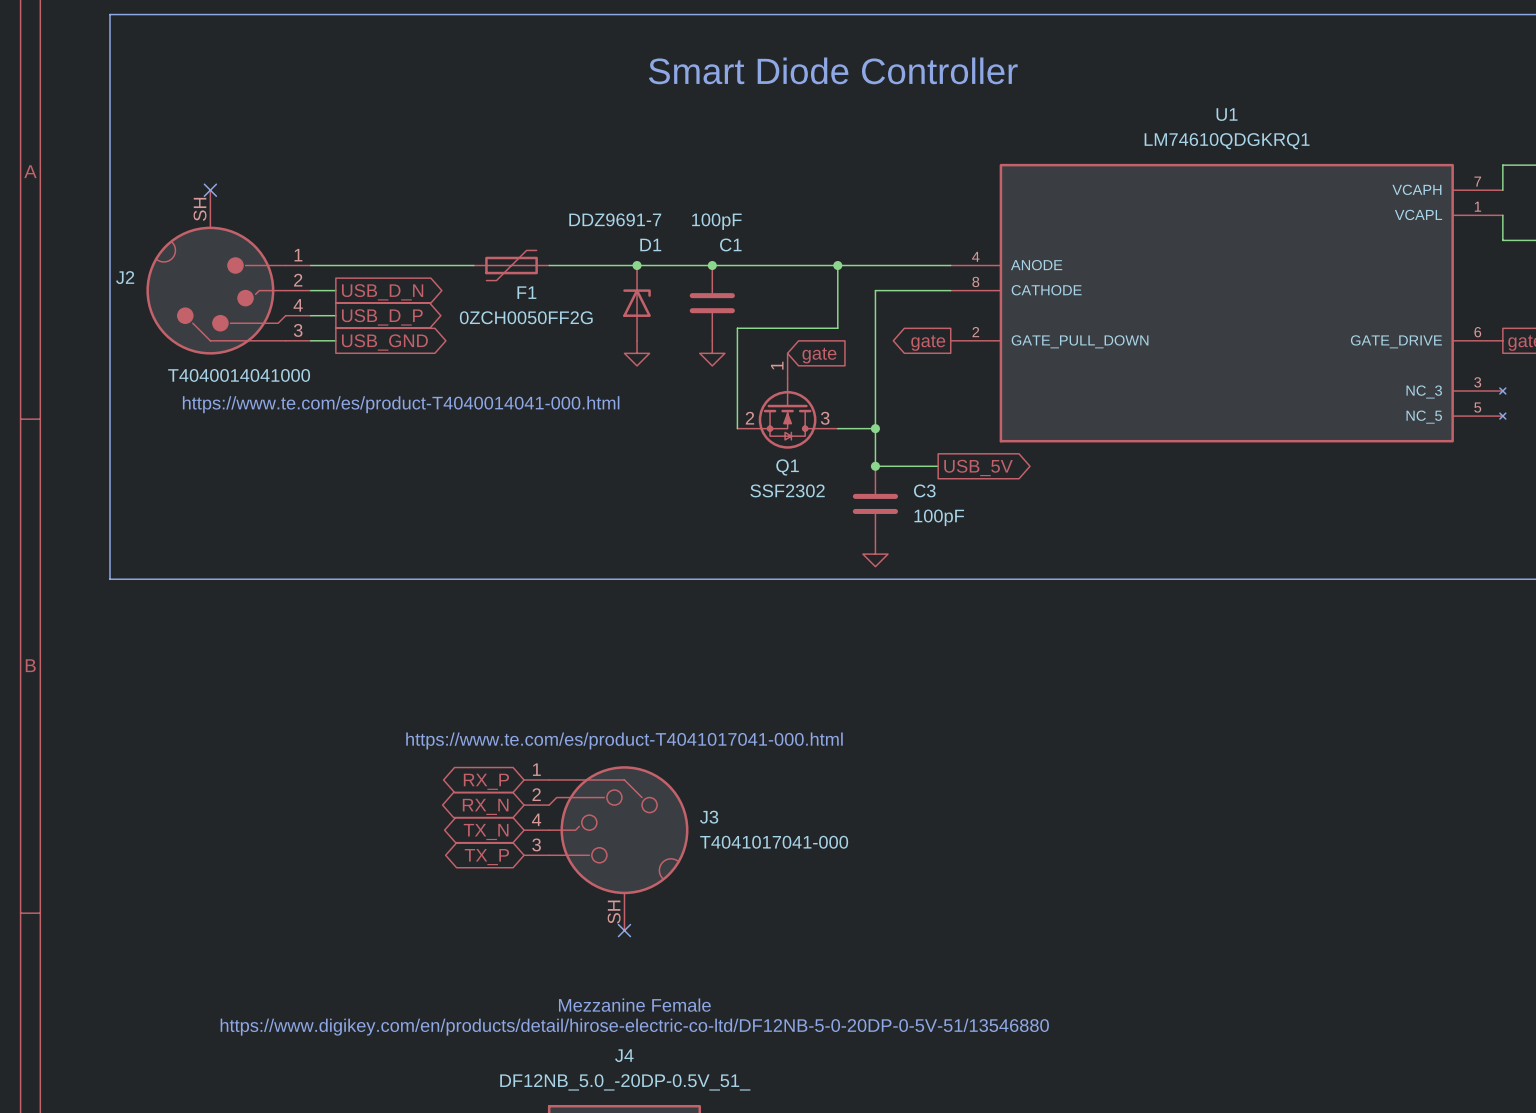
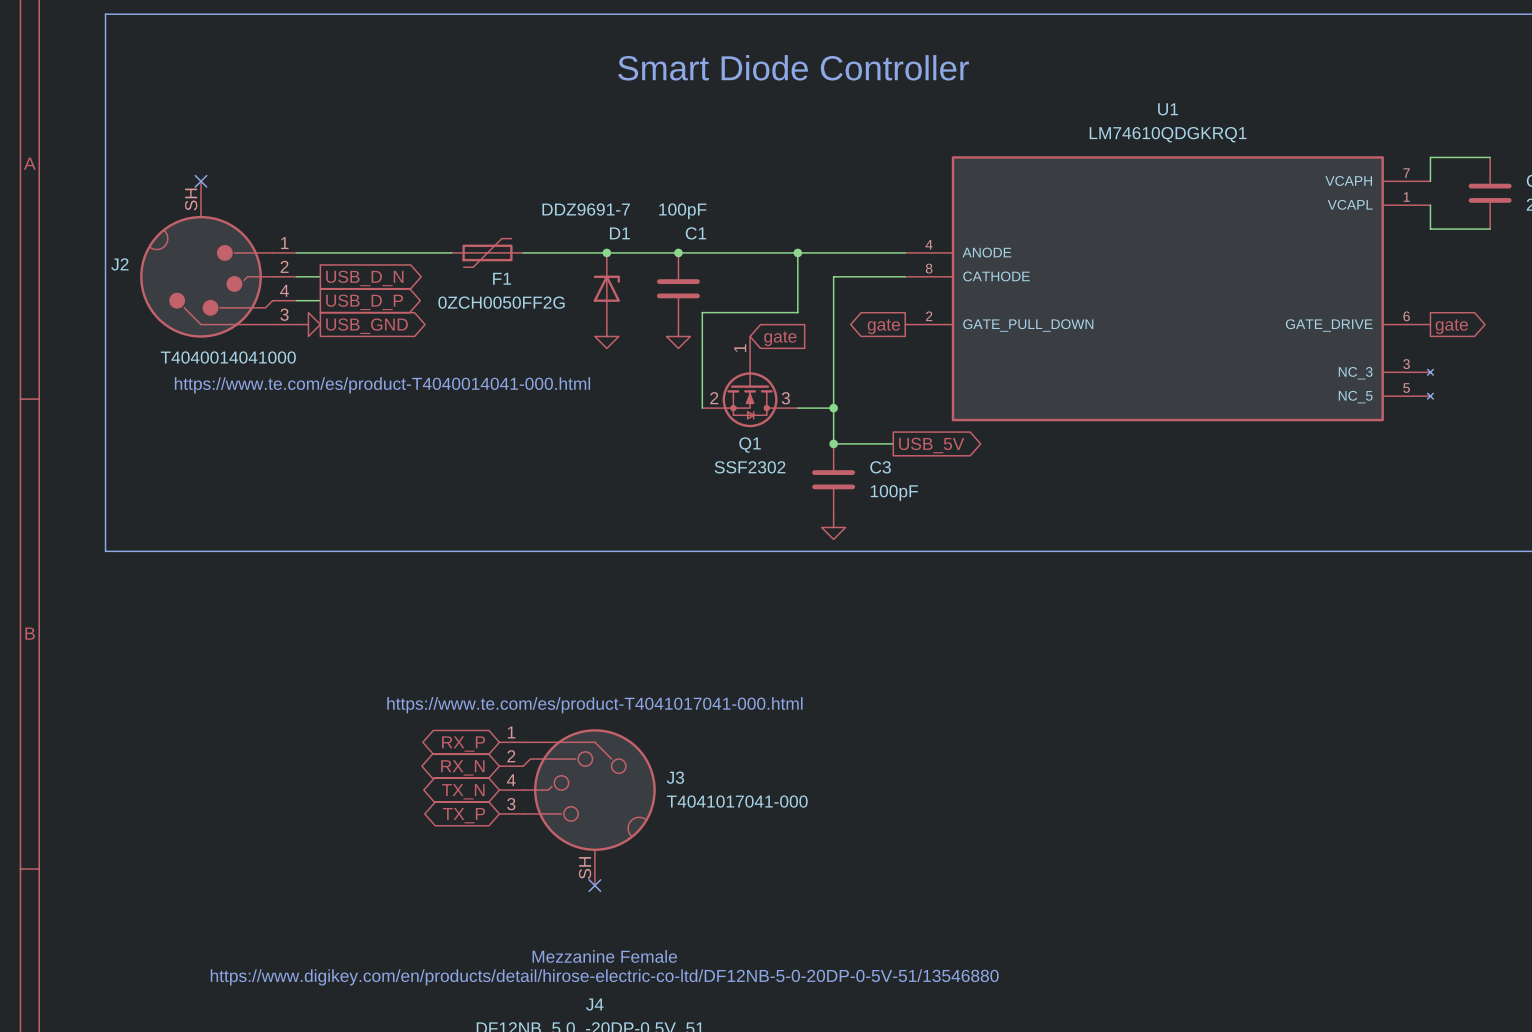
power symbol: none -> (308, 324)

